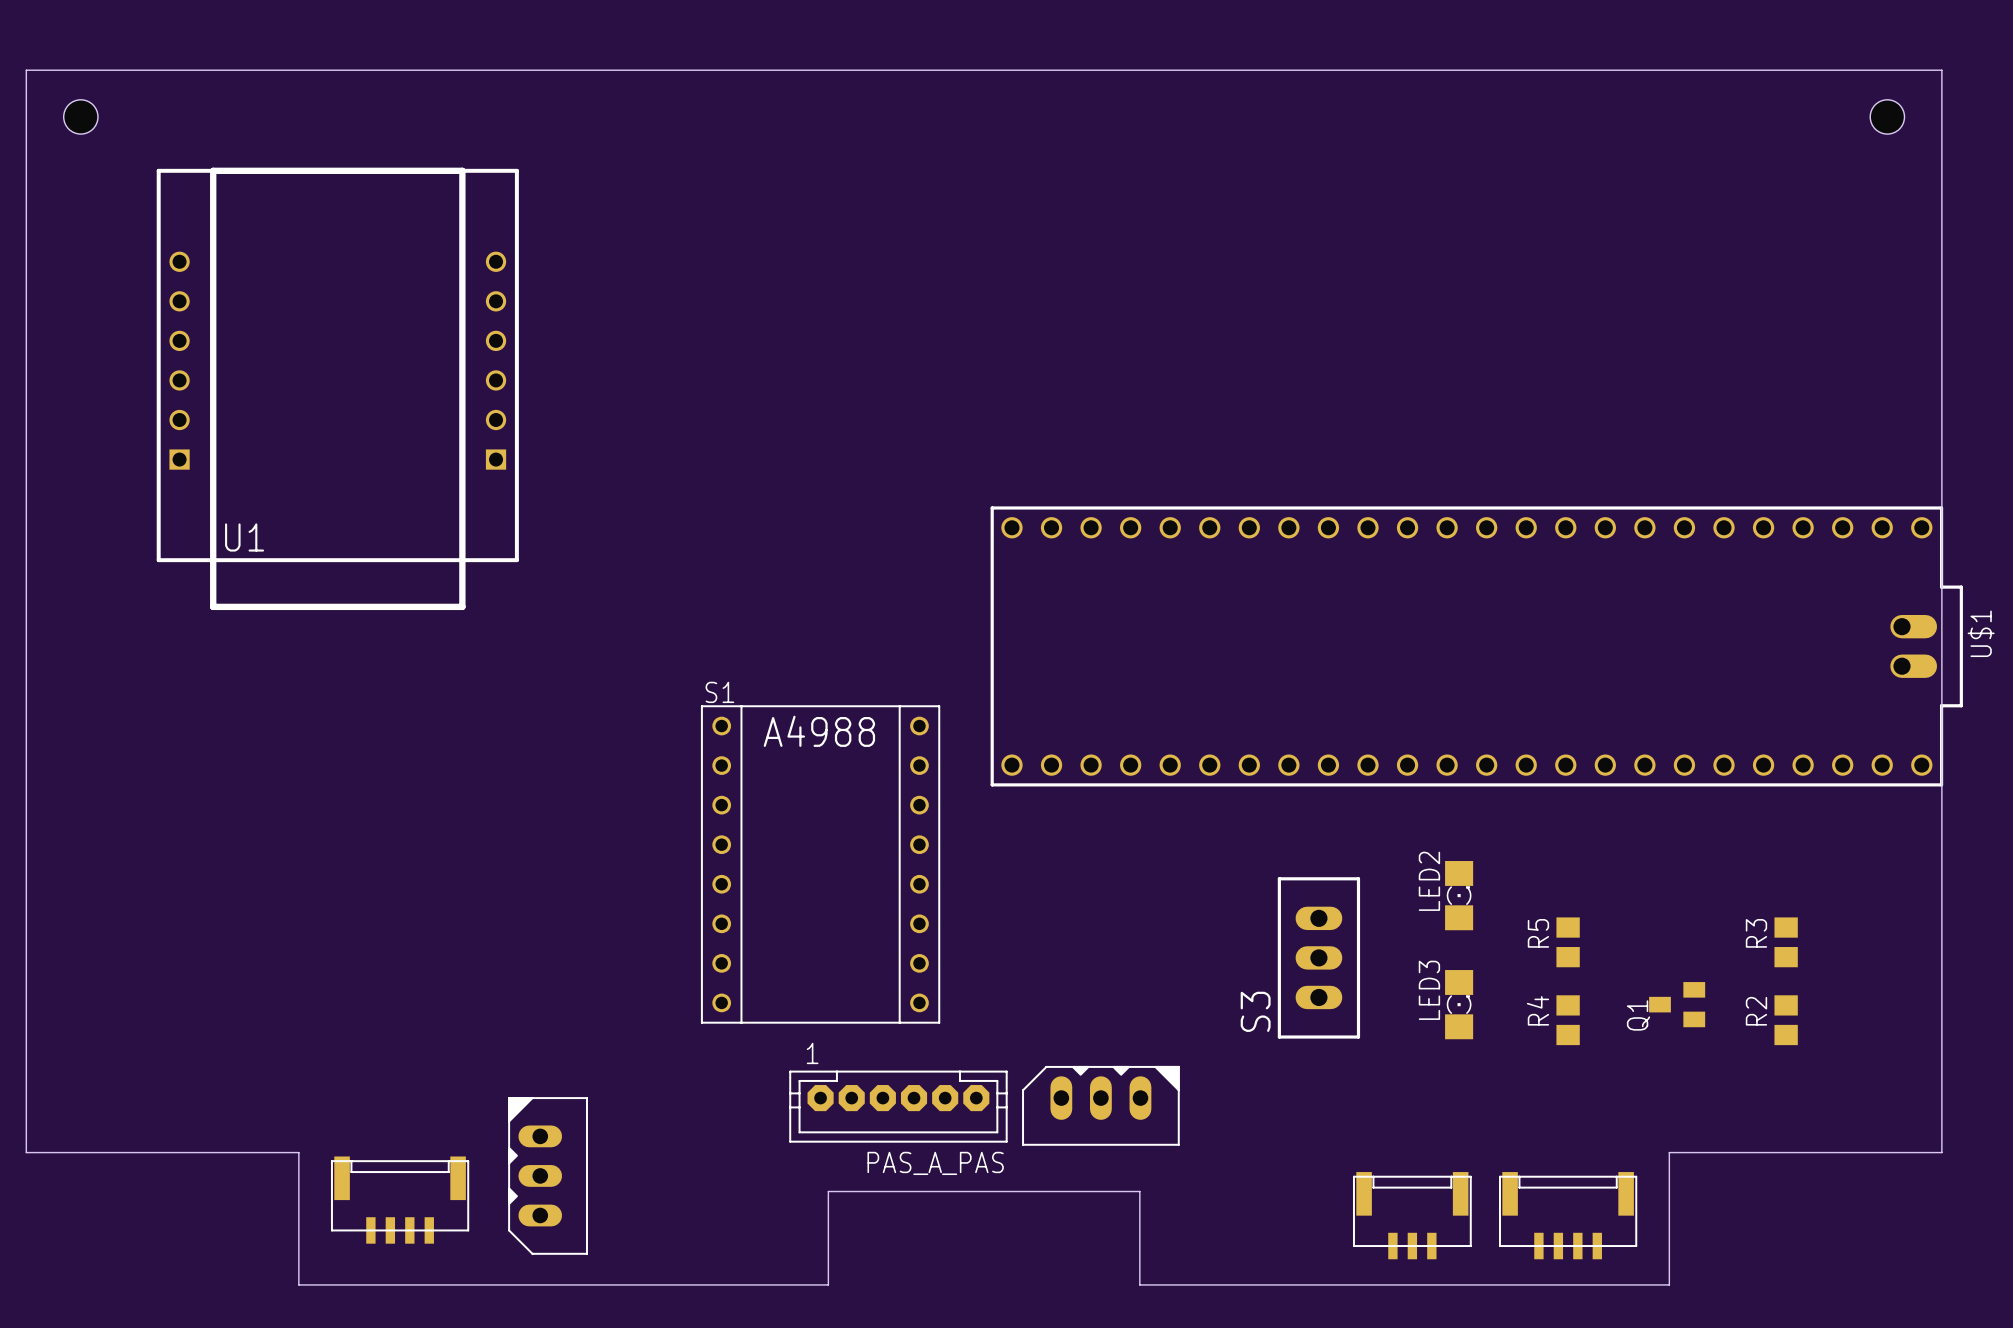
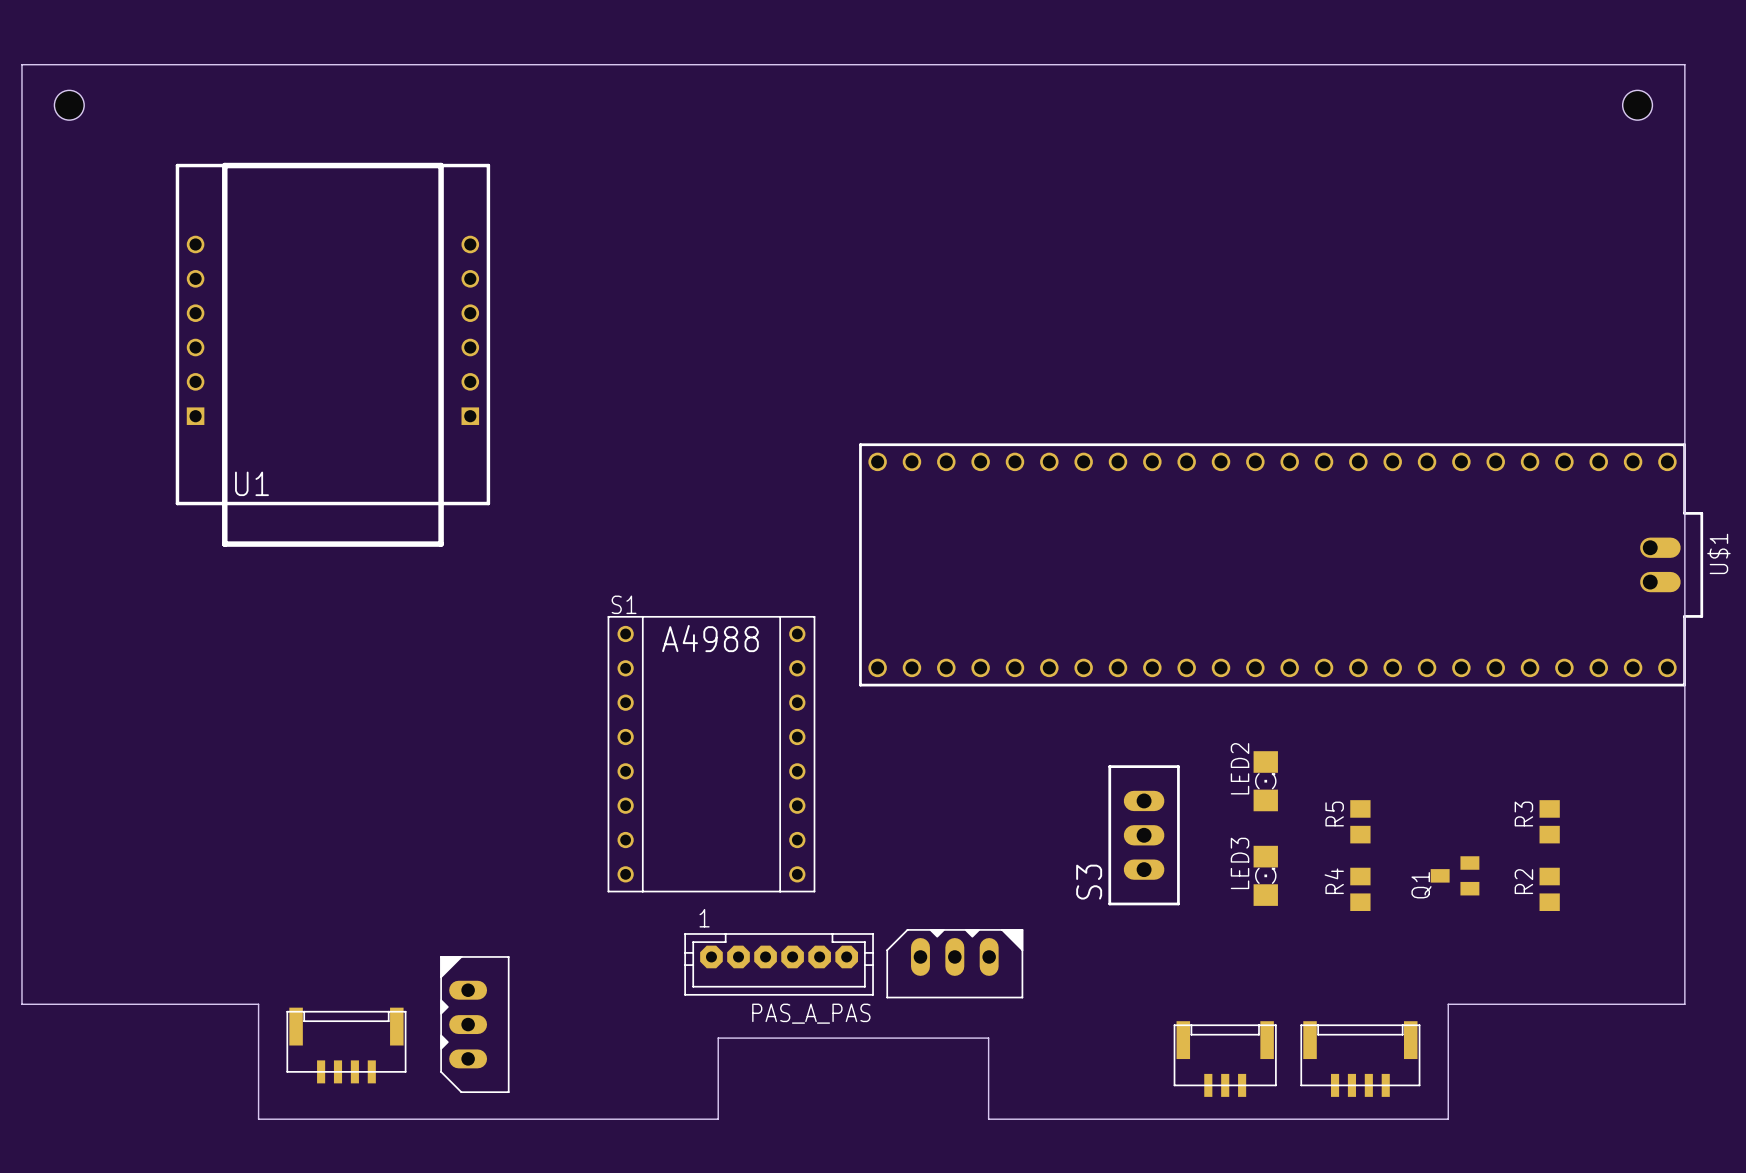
U1 position: (337, 388) -> (332, 354)

